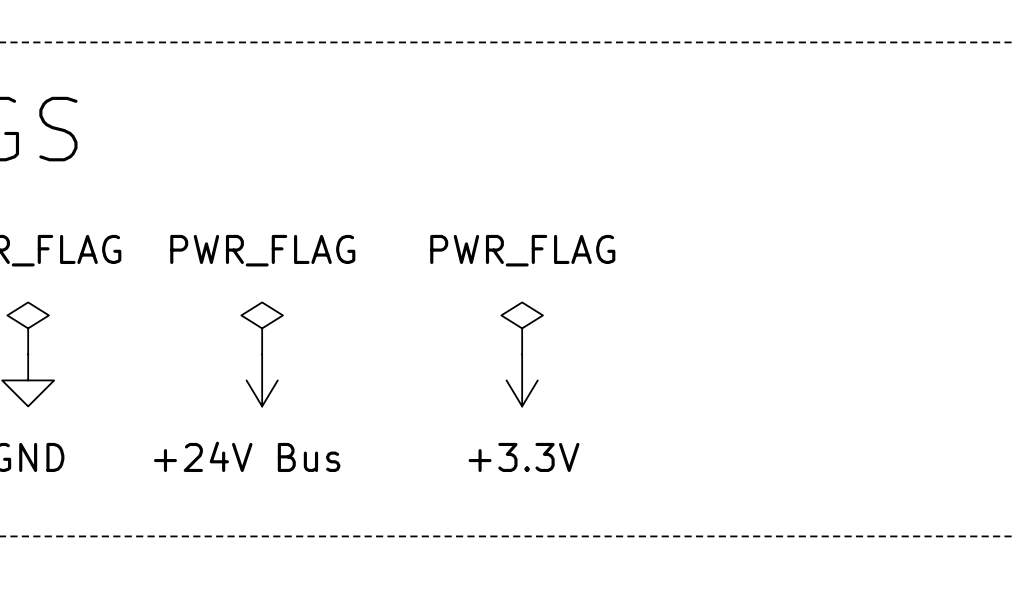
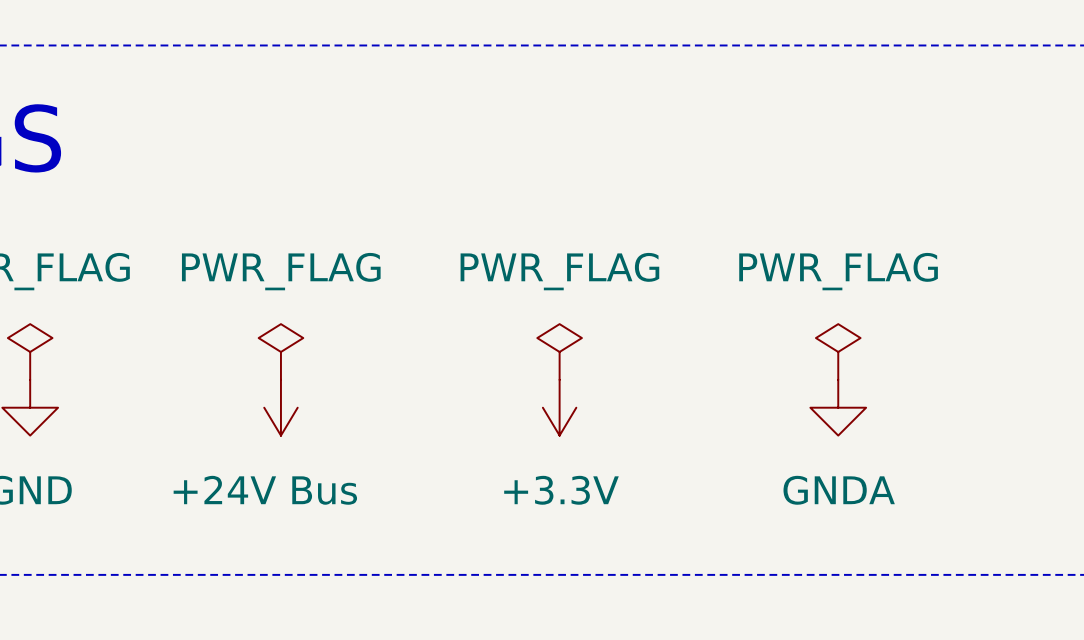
power symbol: none -> PWR_FLAG (838, 351)
power symbol: none -> GNDA (838, 407)

